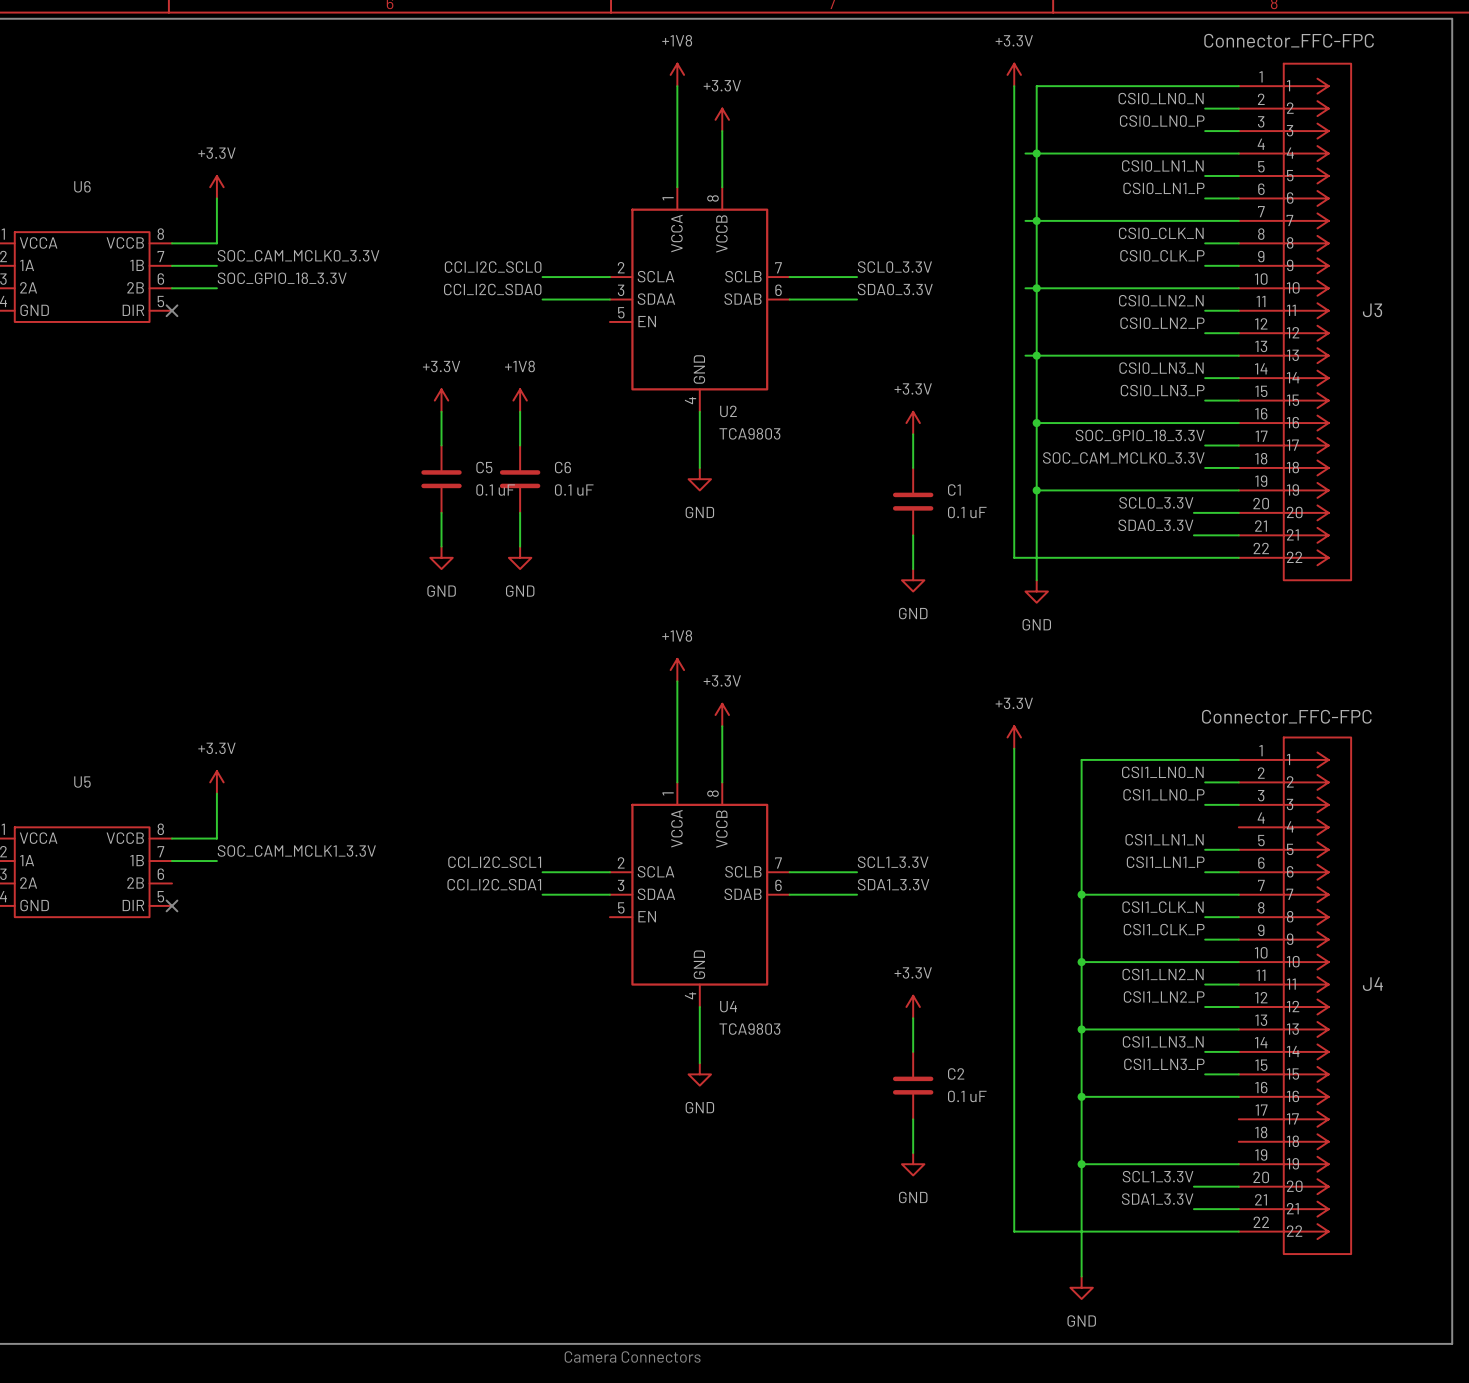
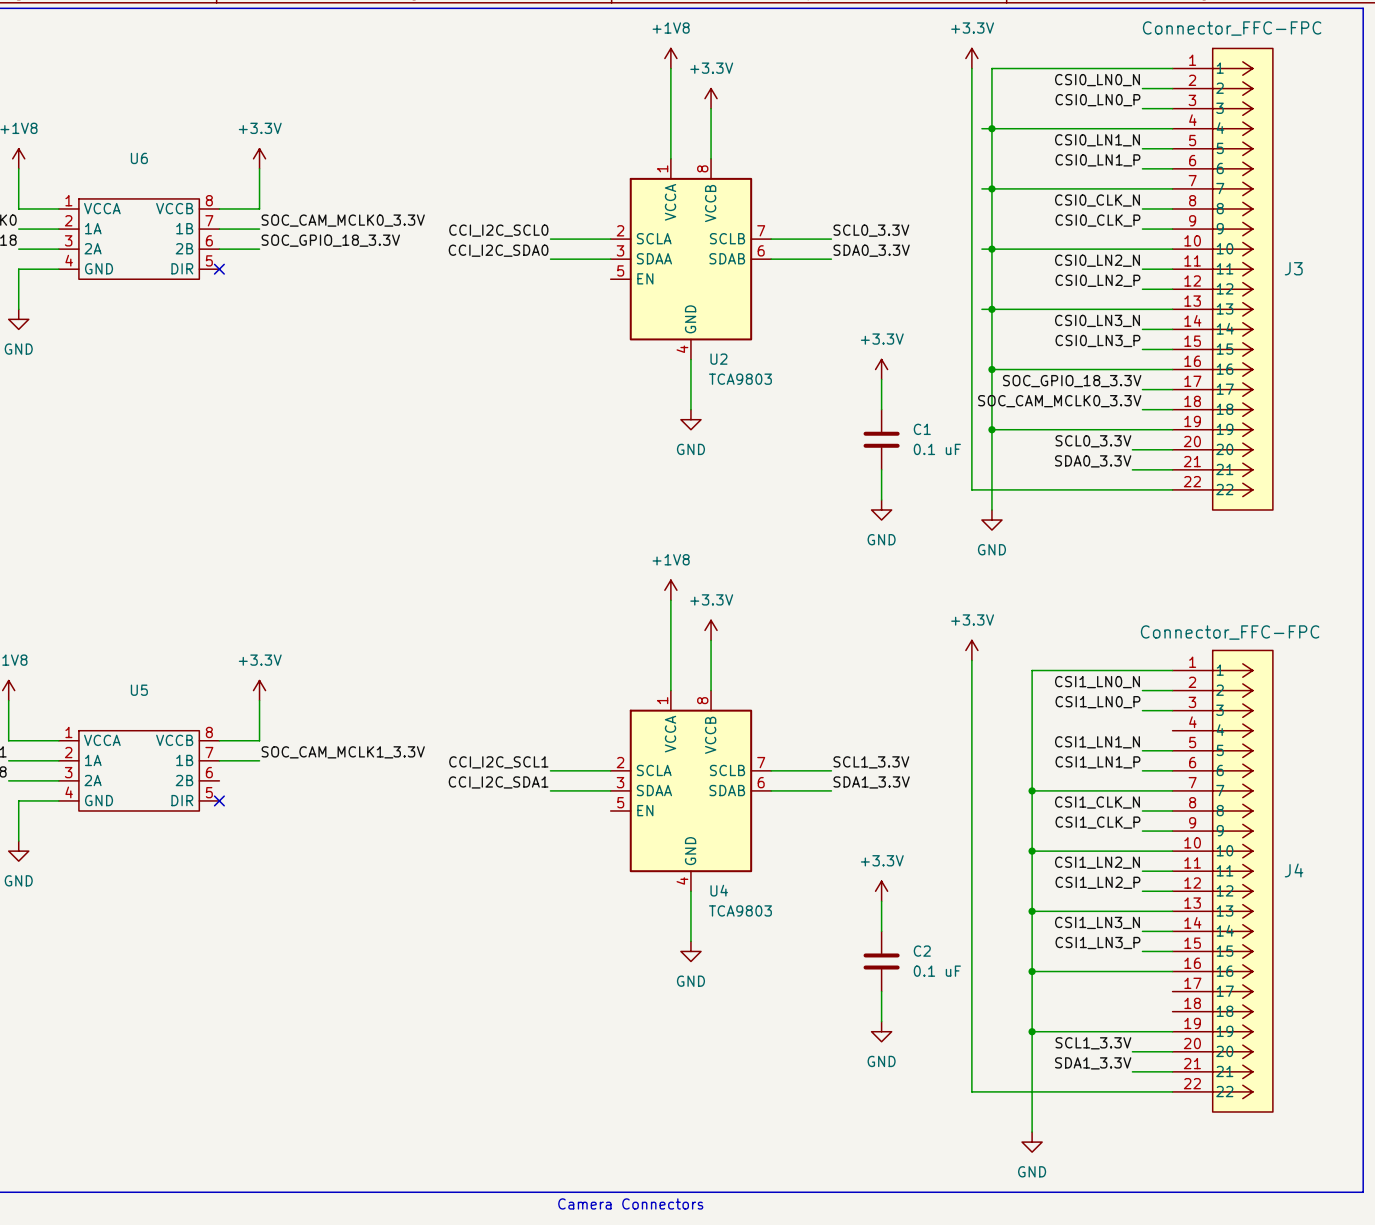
power symbol: +3.3V (441, 400) -> none
power symbol: +1V8 (520, 400) -> none
wire: (441, 411) (441, 445) -> none
wire: (520, 411) (520, 445) -> none
C5: 0.1 uF (441, 479) -> none
C6: 0.1 uF (520, 479) -> none
wire: (441, 512) (441, 546) -> none
wire: (520, 512) (520, 546) -> none
power symbol: GND (441, 557) -> none
power symbol: GND (520, 557) -> none

